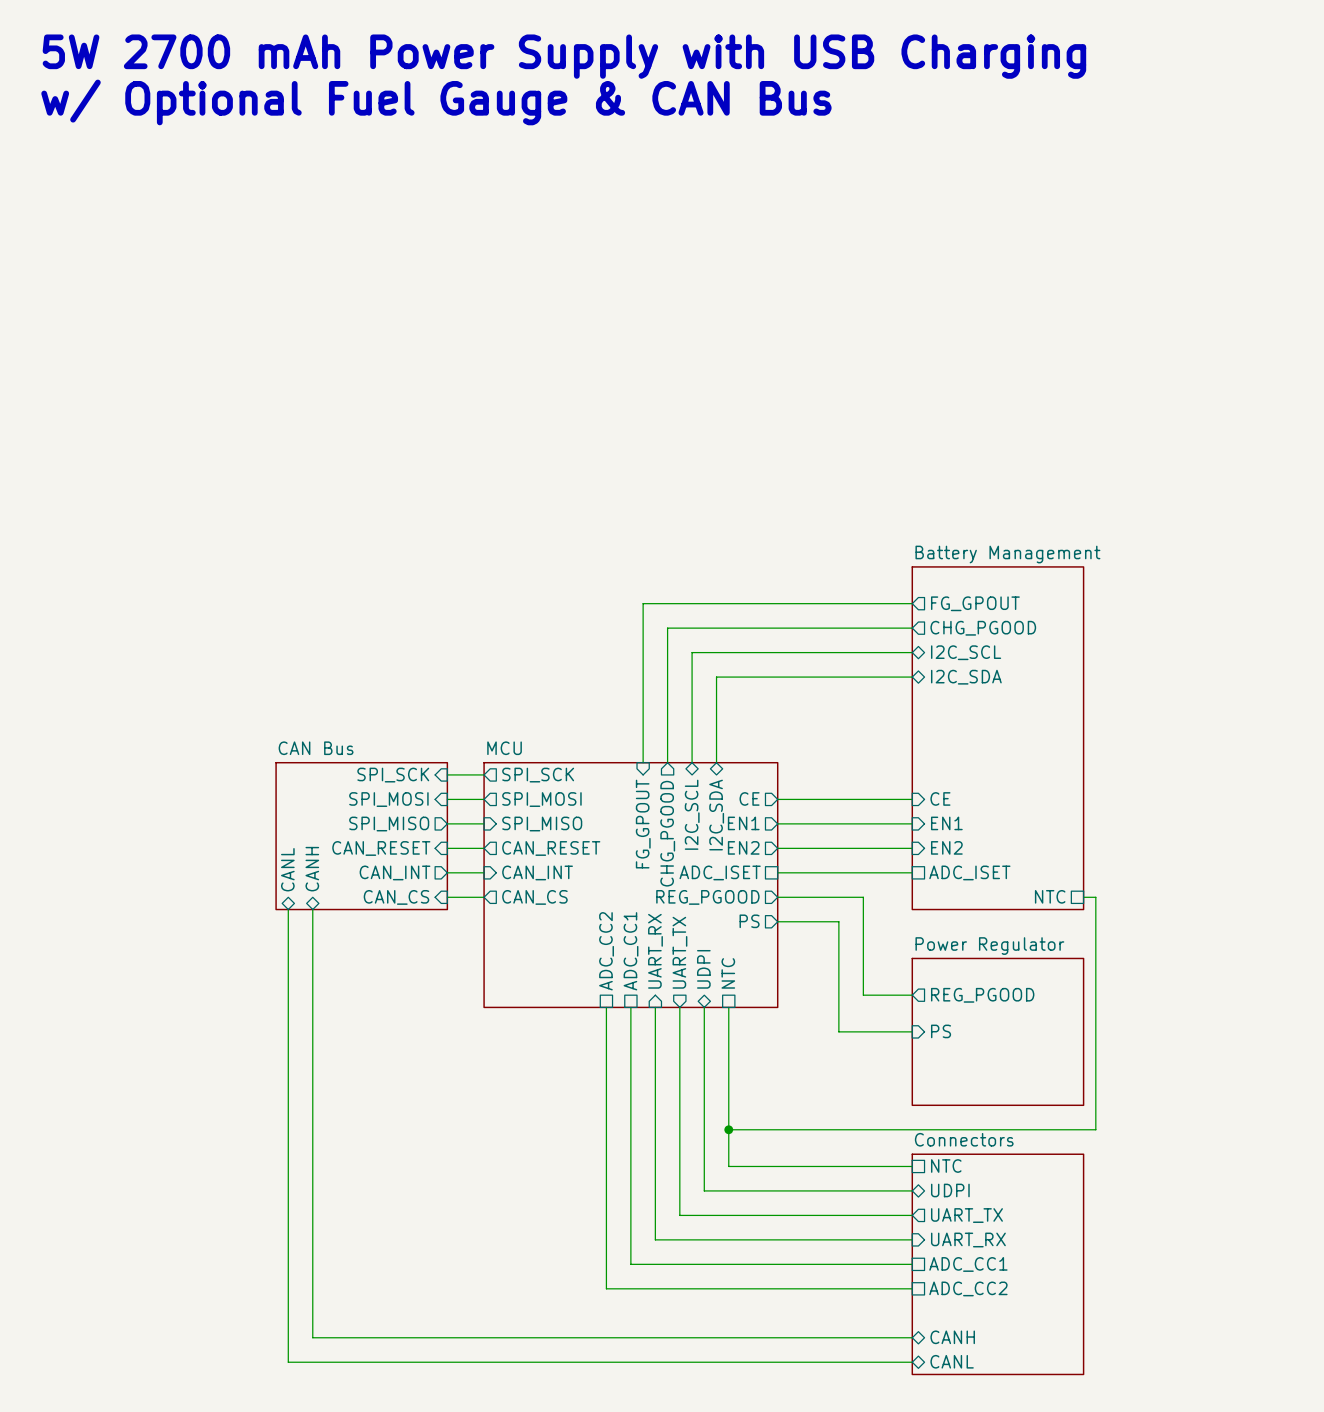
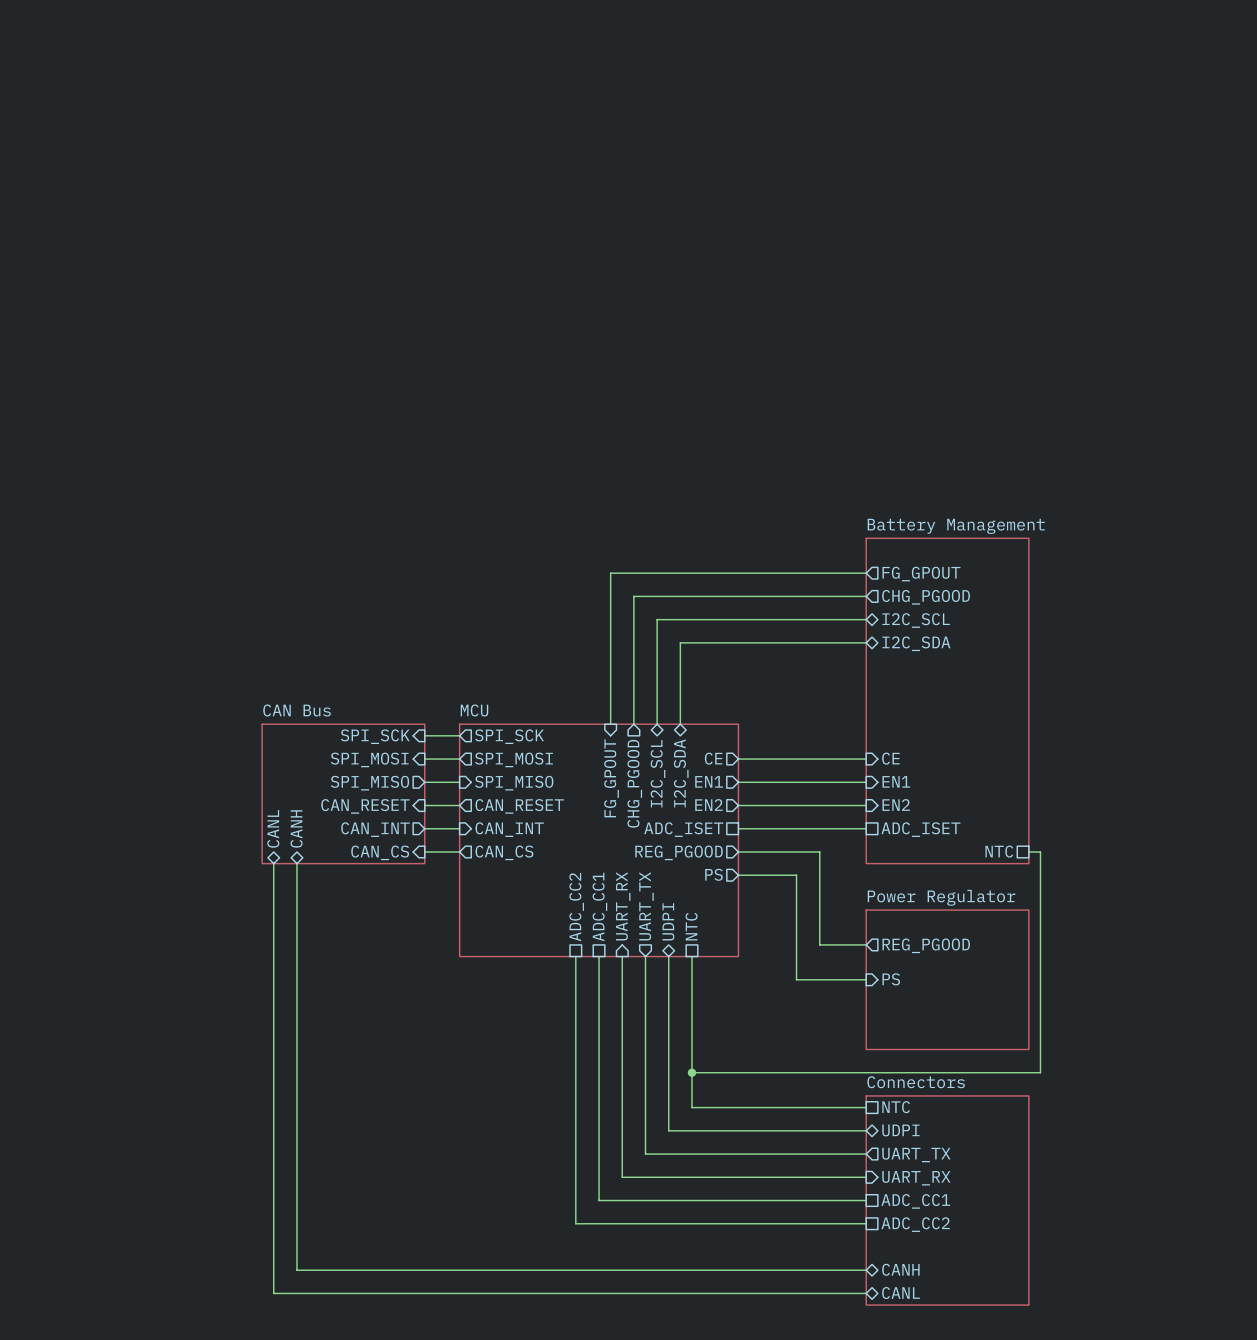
text: 5W 2700 mAh Power Supply with USB Charging (564, 56) -> none
text: w/ Optional Fuel Gauge & CAN Bus (436, 102) -> none

